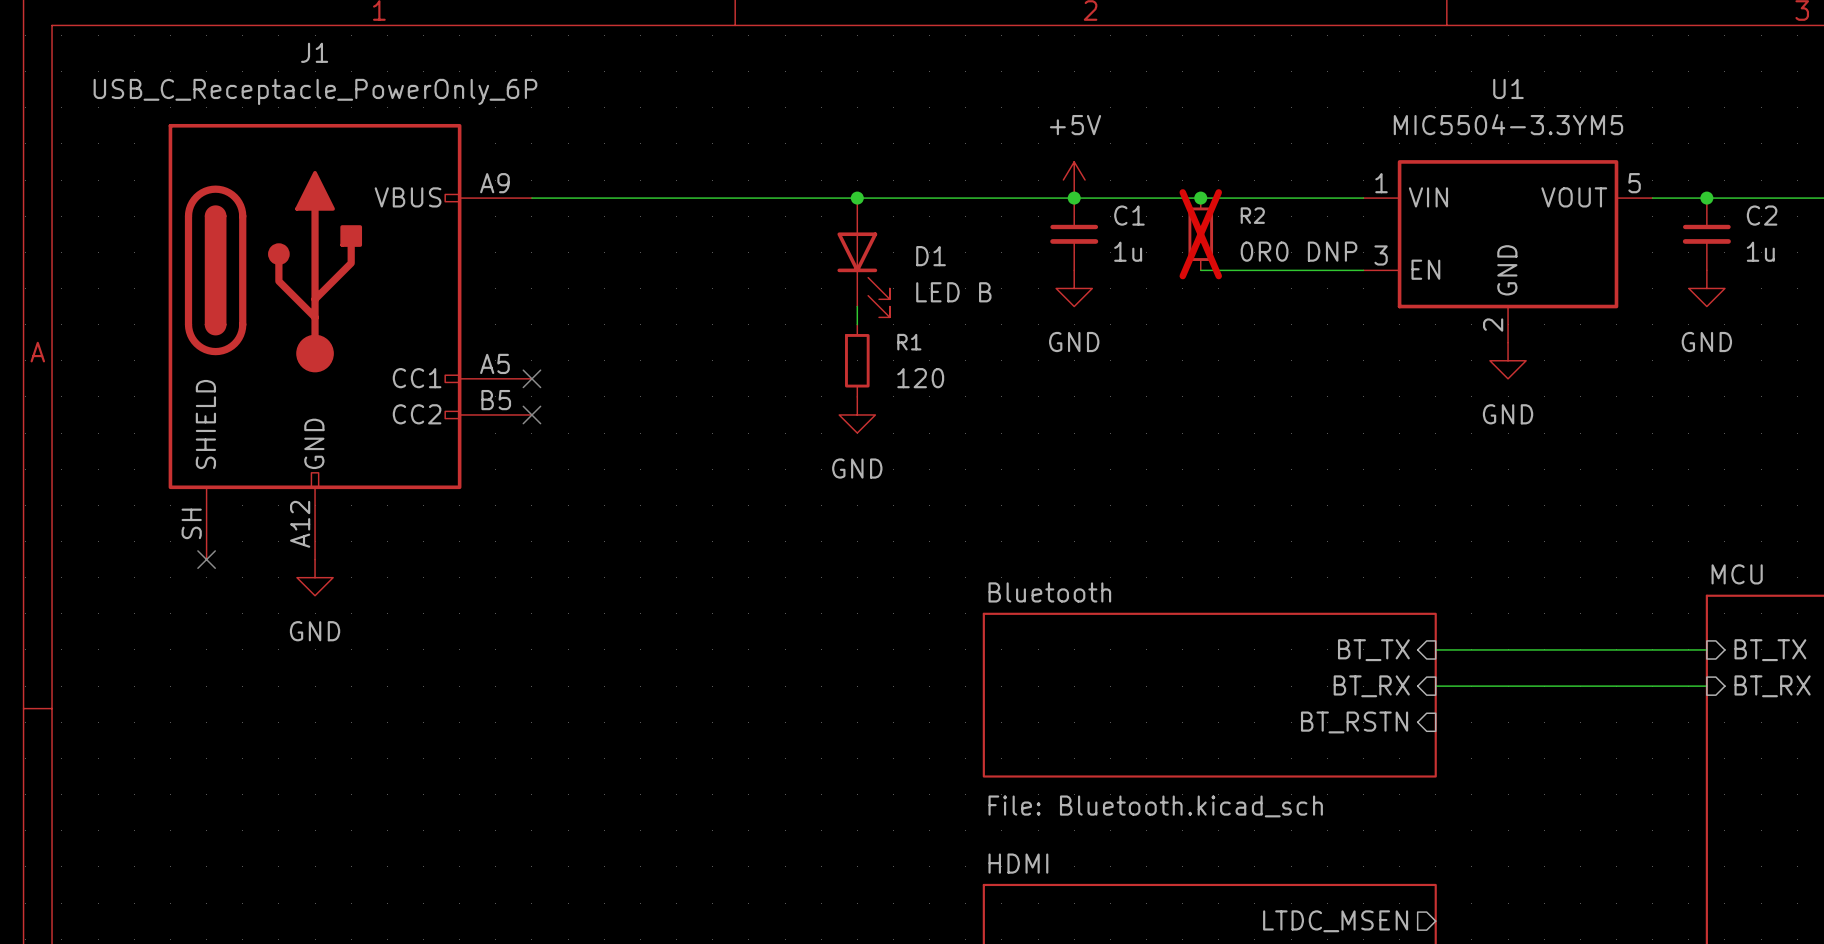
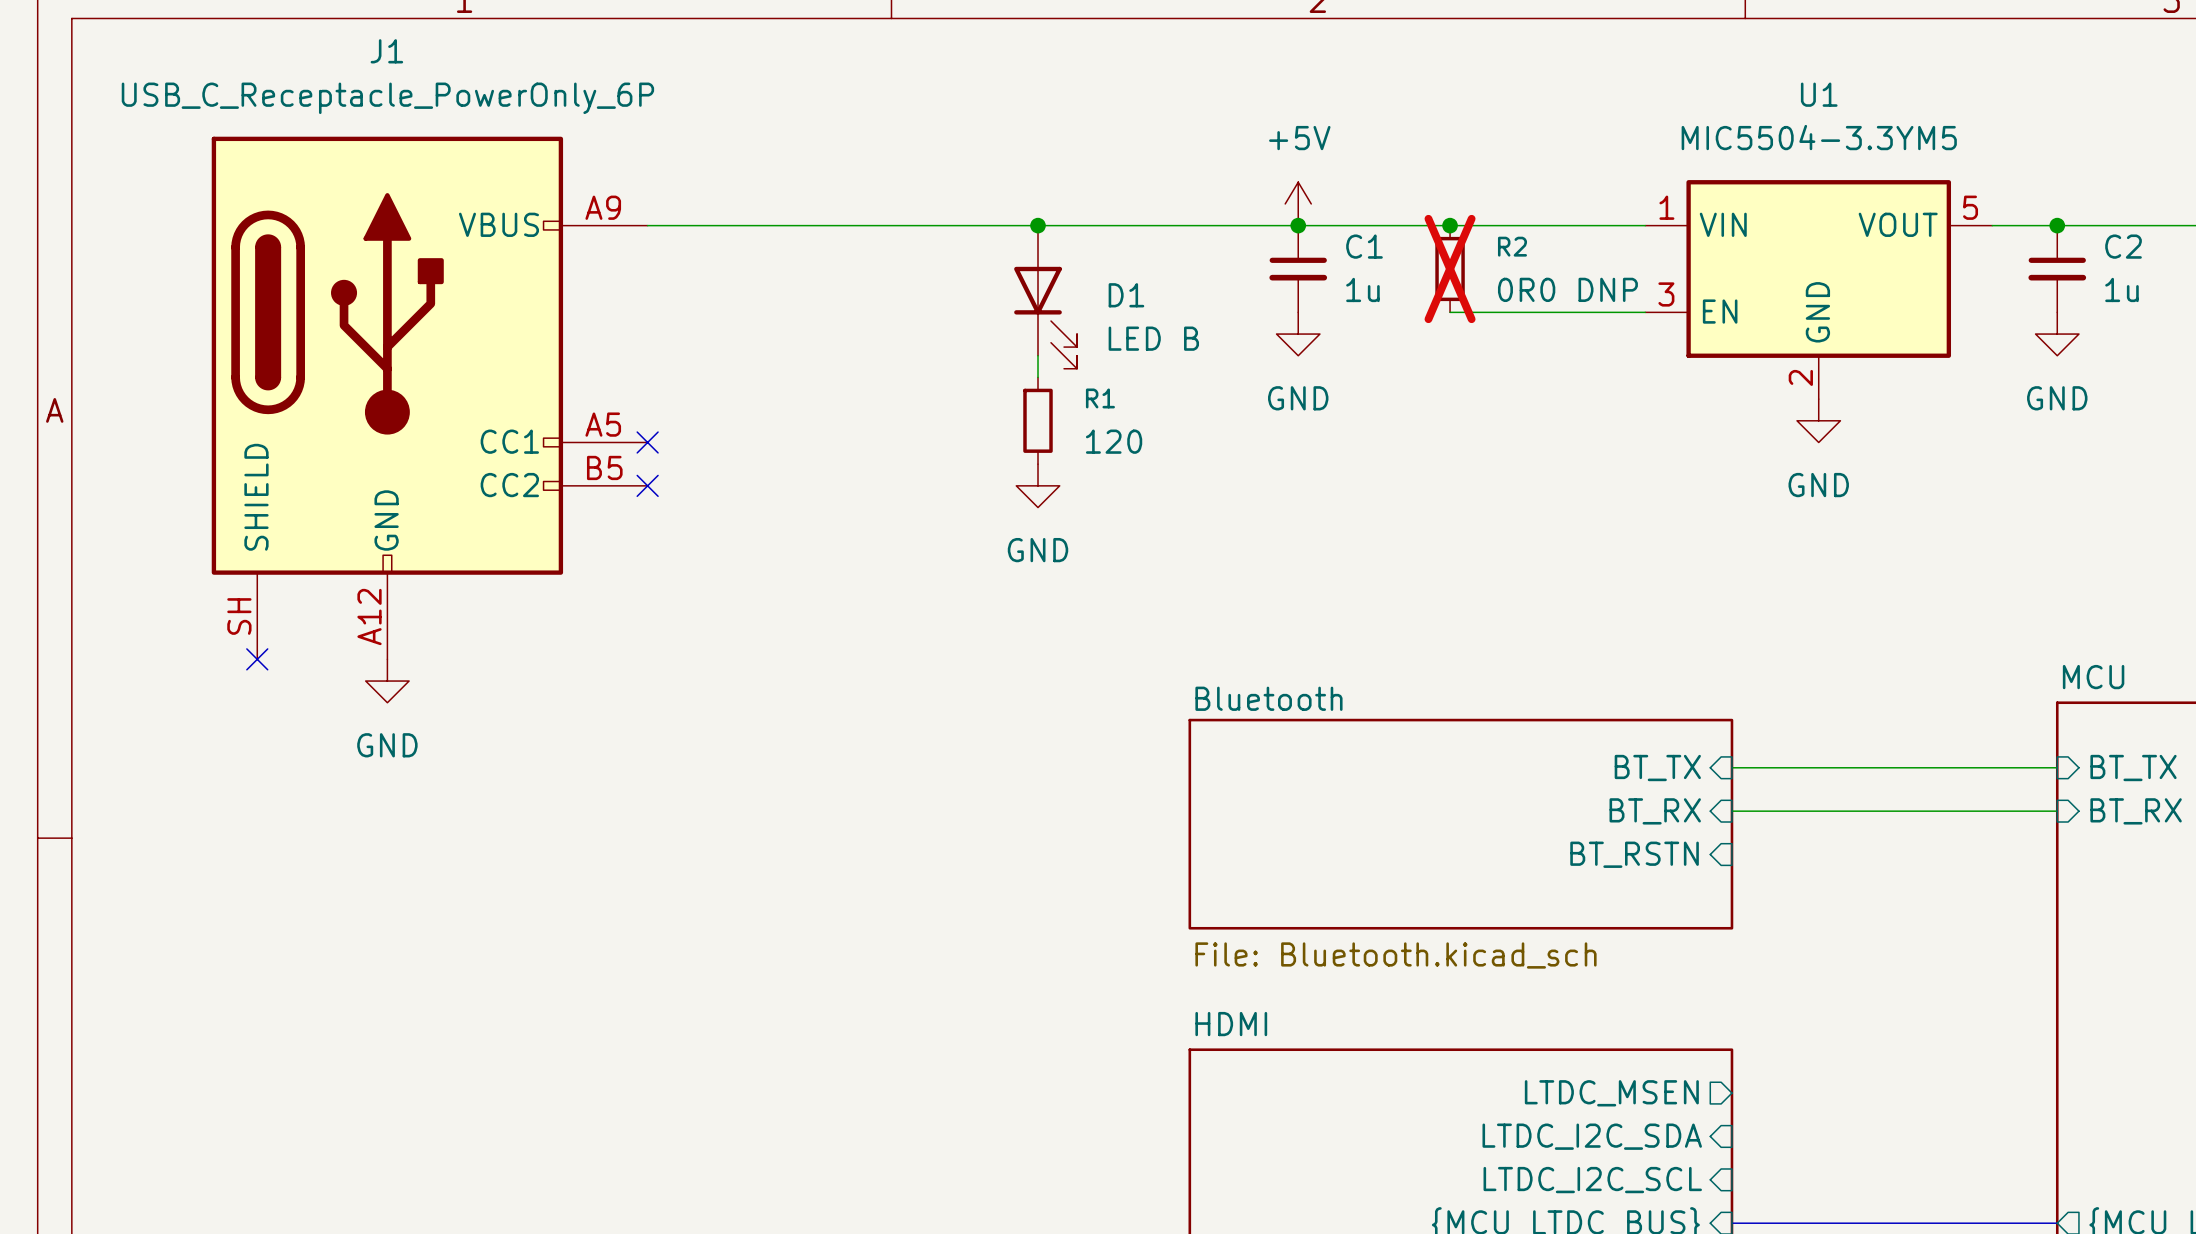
sheet Bluetooth shape: [982, 612, 1437, 778] -> [1188, 718, 1734, 930]

